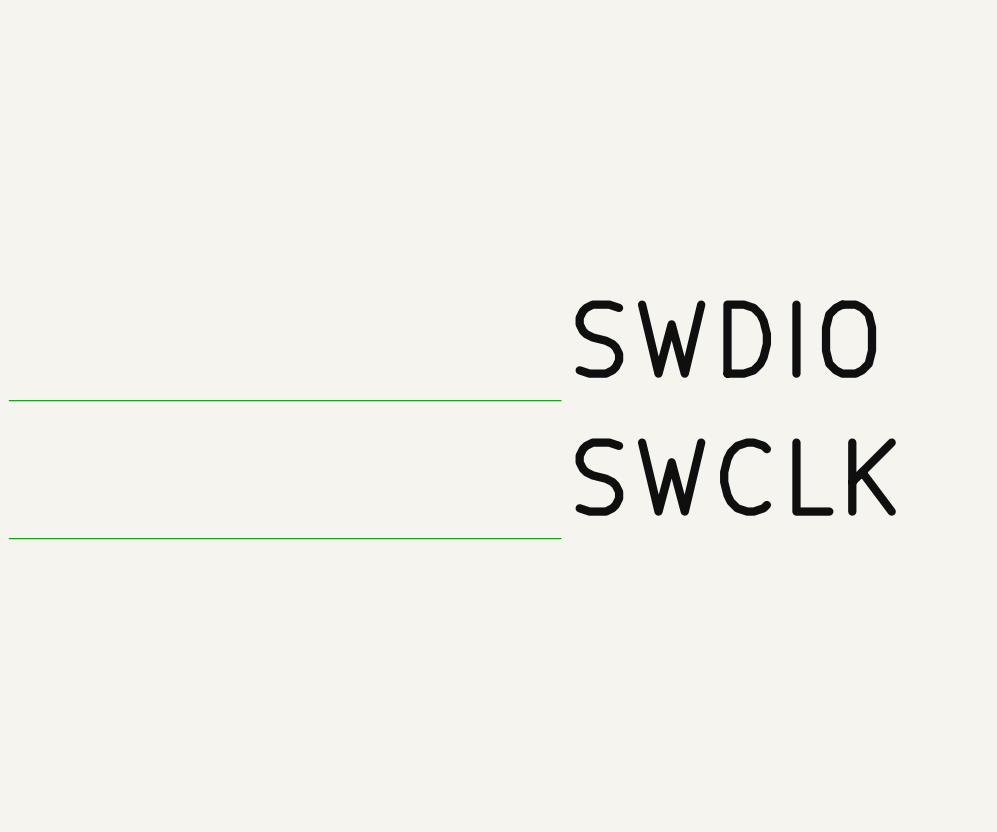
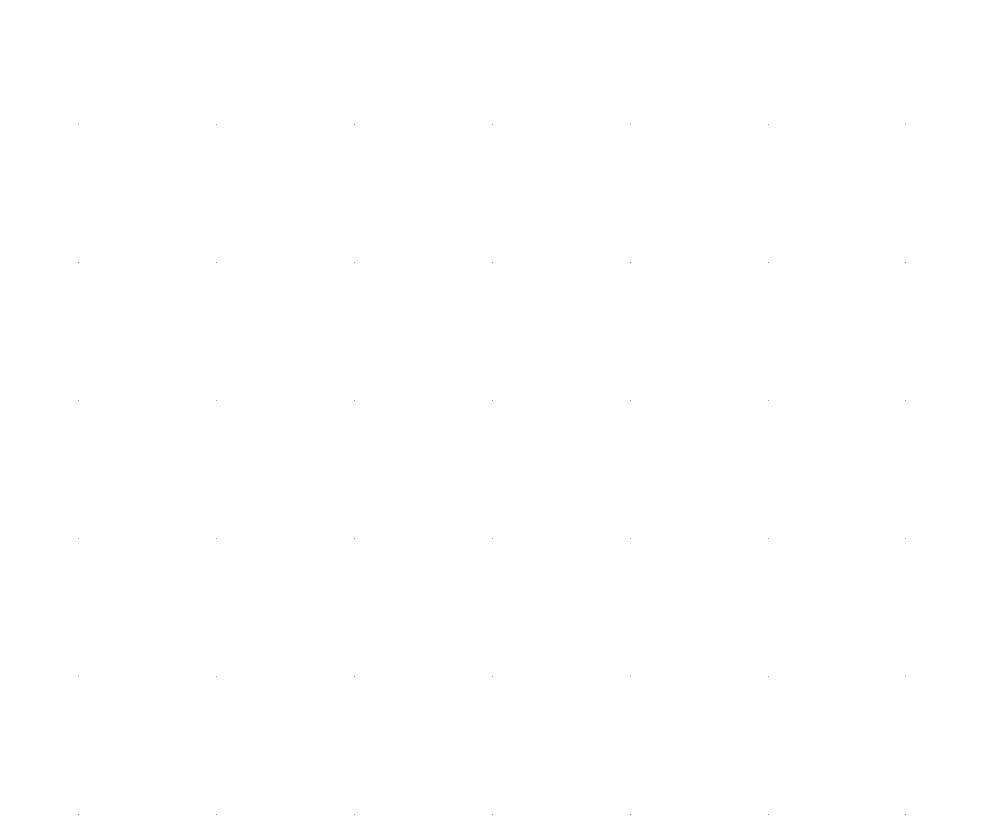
label: SWDIO (725, 339) -> none
wire: (9, 400) (561, 400) -> none
label: SWCLK (735, 477) -> none
wire: (9, 538) (561, 538) -> none

